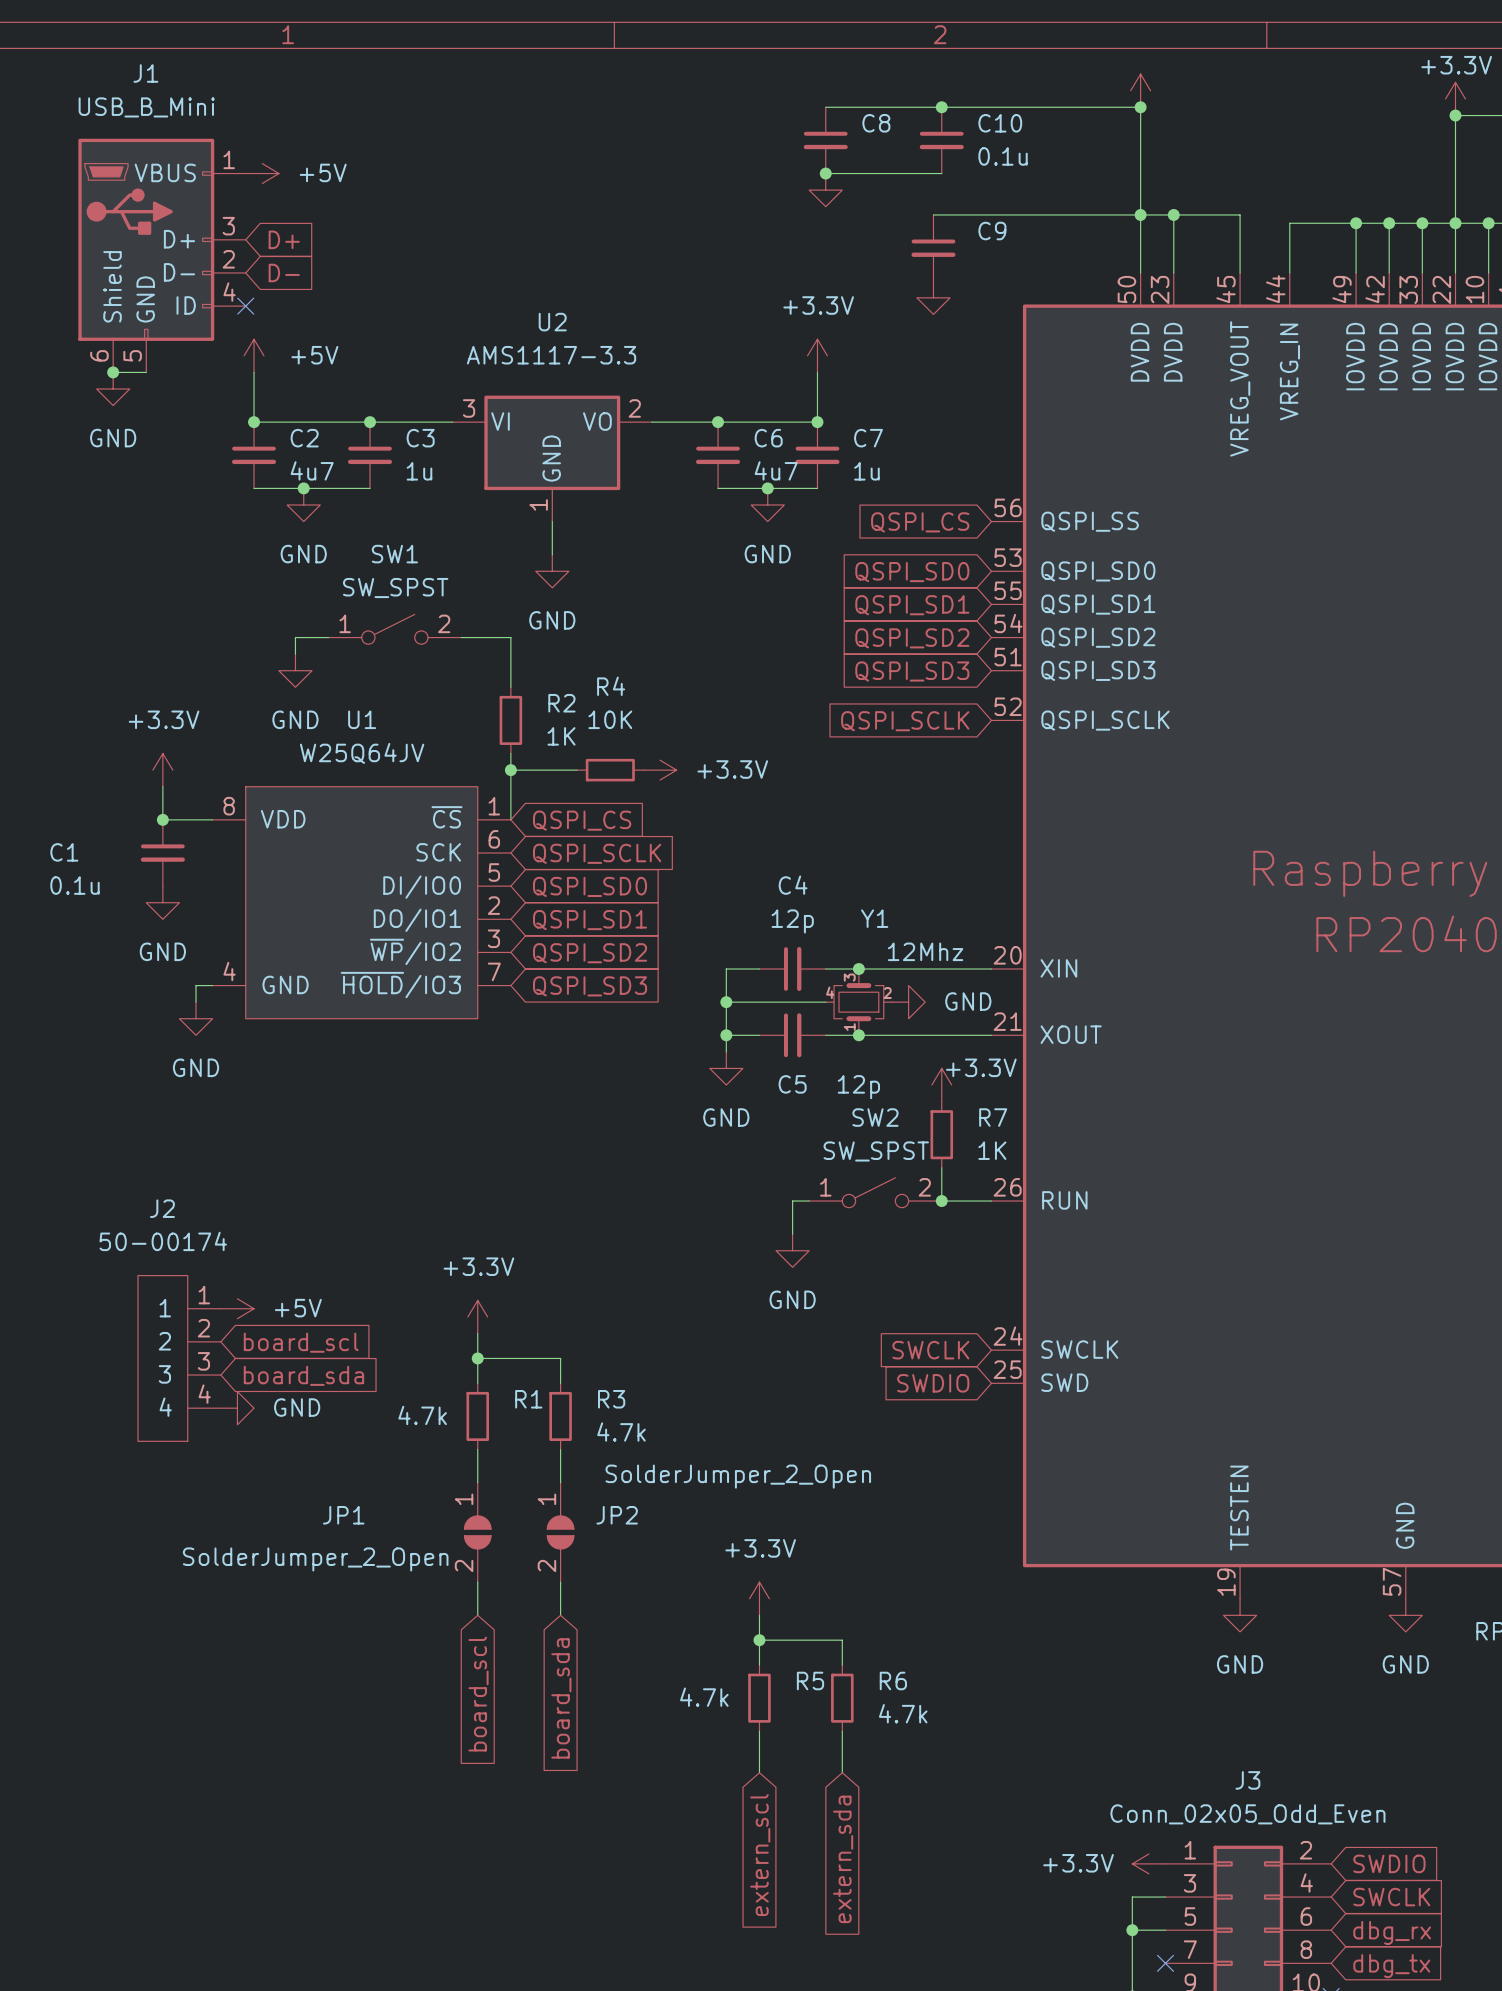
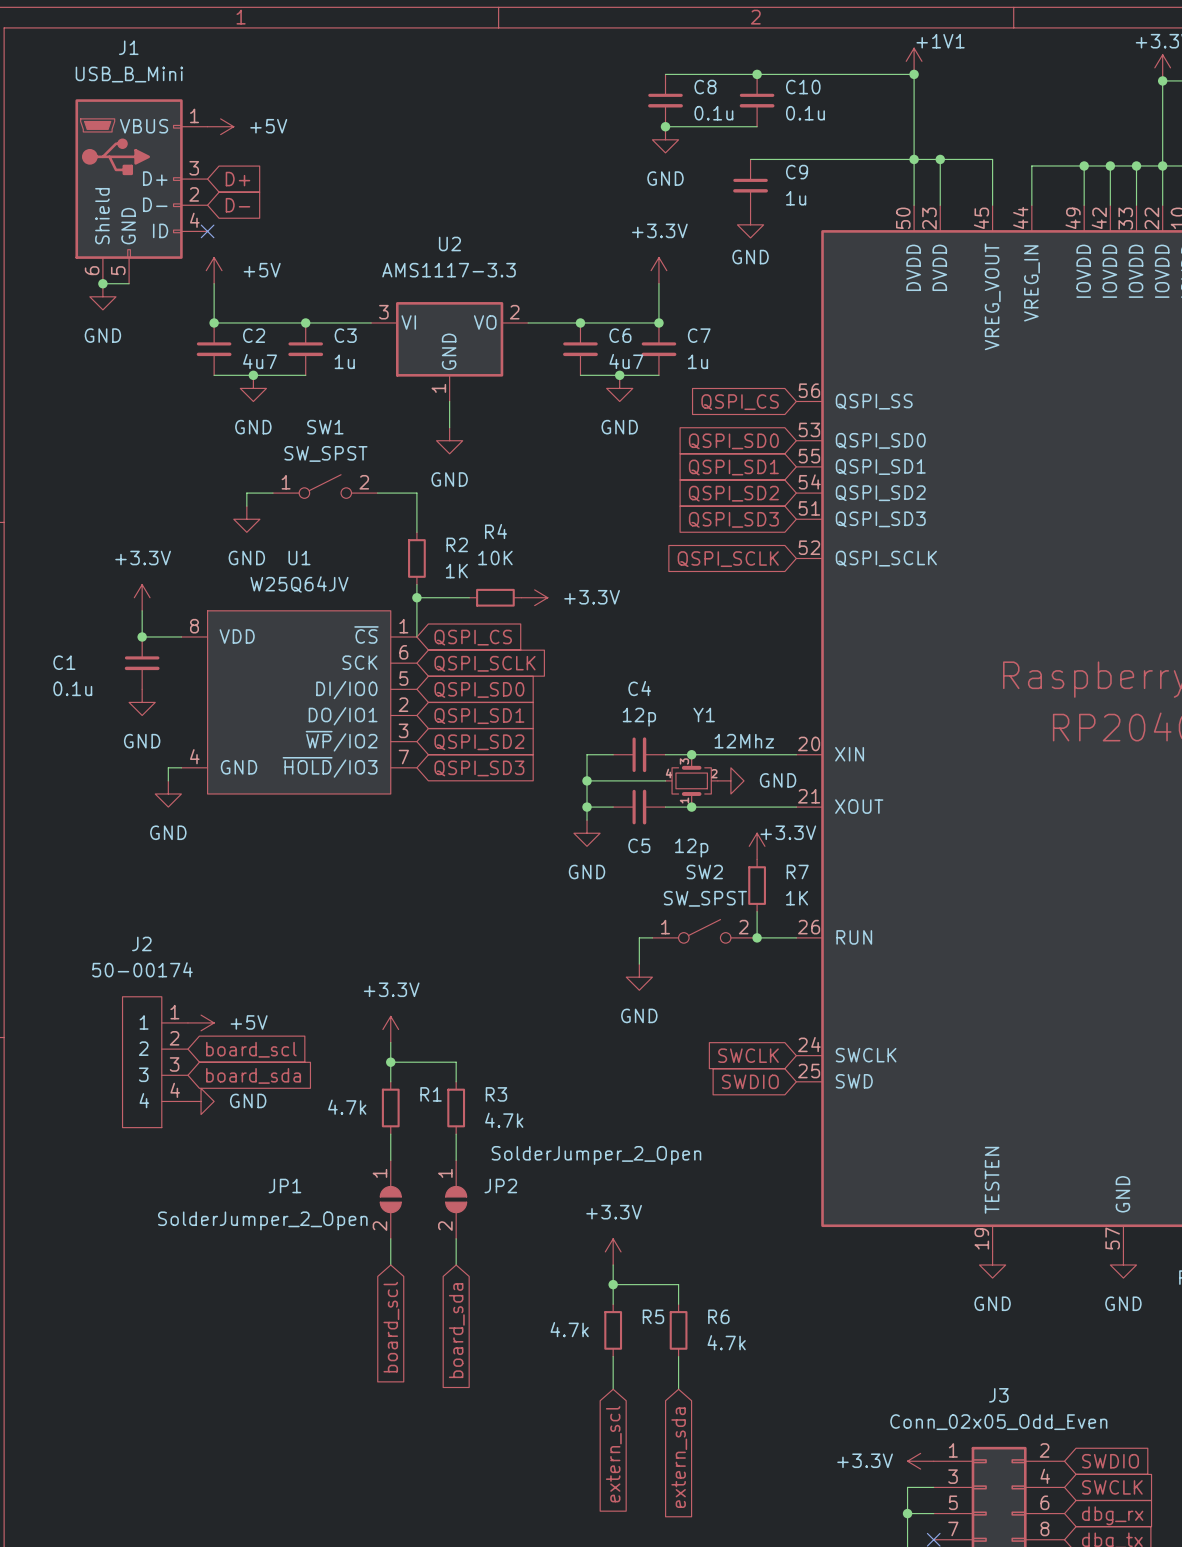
power symbol text: none -> +1V1 (940, 41)
C8 value: none -> 0.1u (713, 113)
power symbol text: none -> GND (665, 178)
C9 value: none -> 1u (796, 198)
power symbol text: none -> GND (750, 257)

